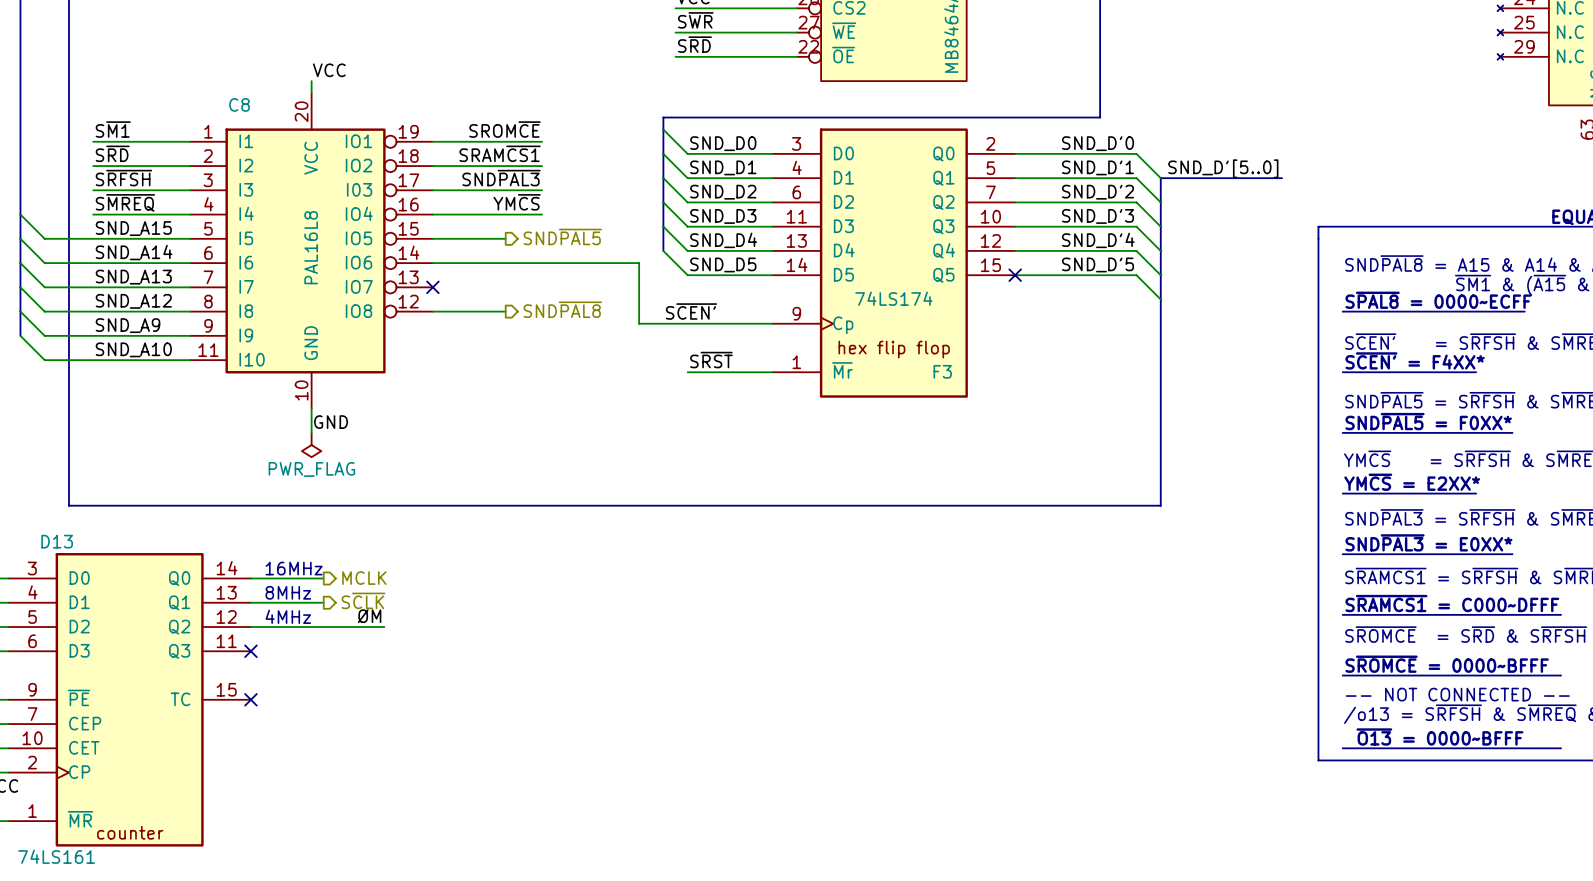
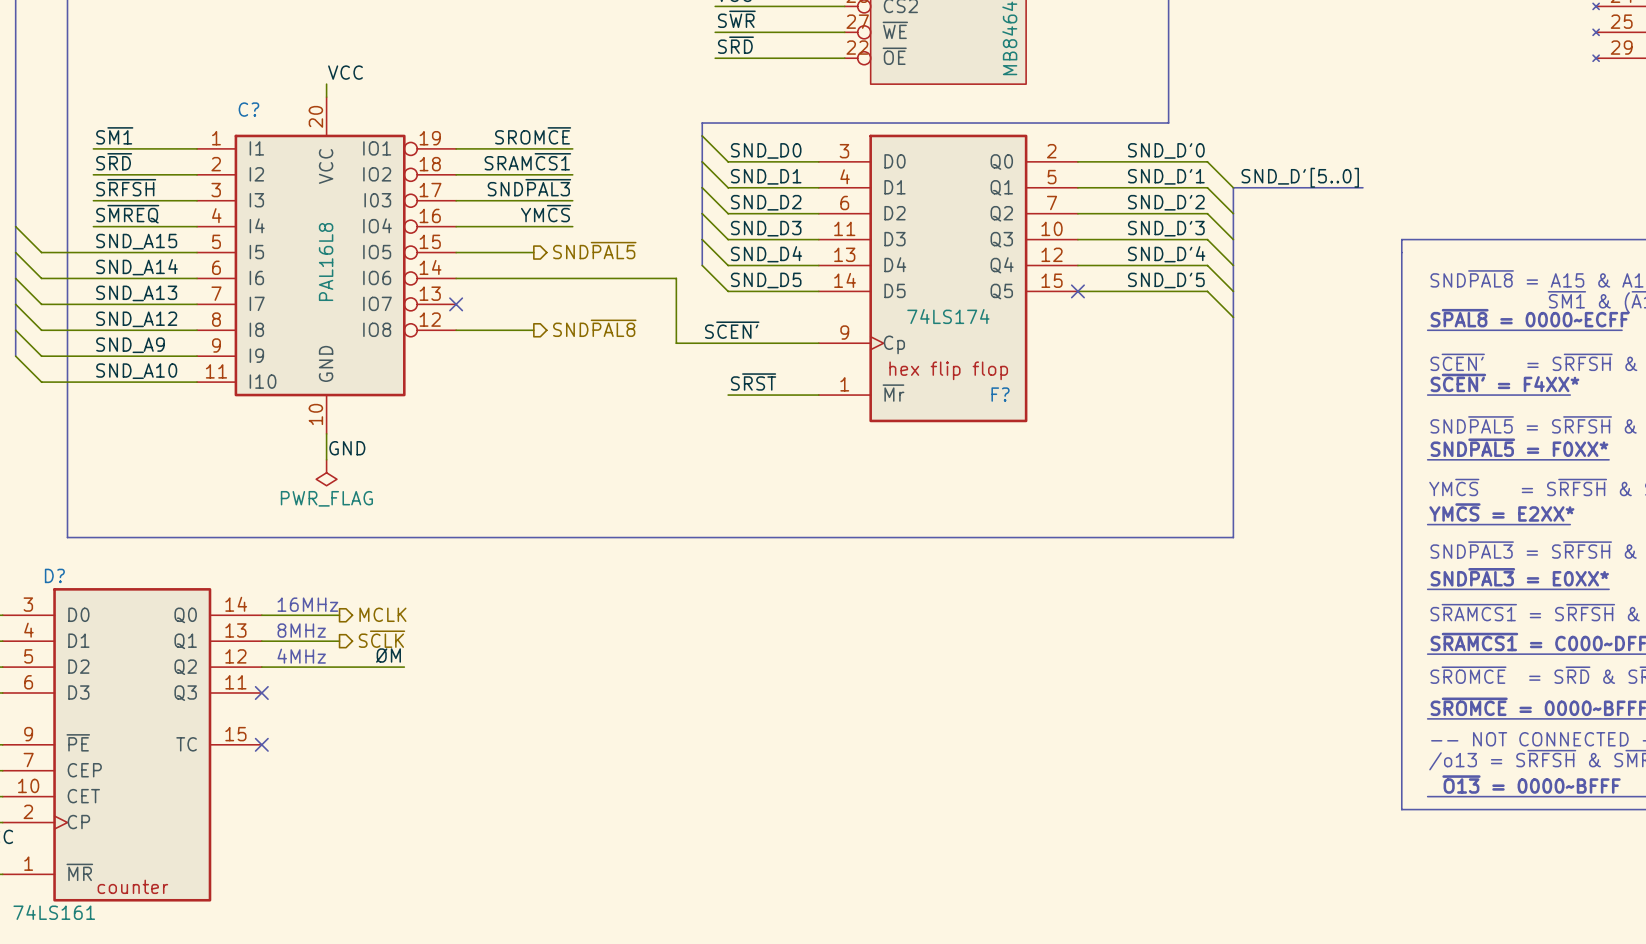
C8 name: C8 (239, 104) -> C? (248, 109)
F3 name: F3 (942, 371) -> F? (1000, 394)
D13 name: D13 (57, 541) -> D? (54, 575)

